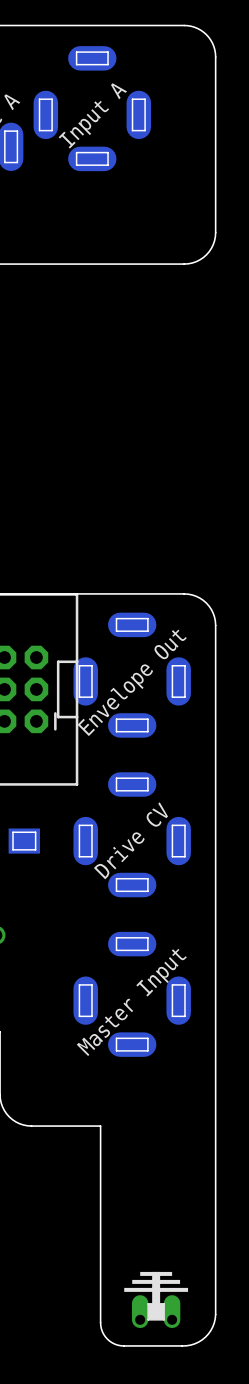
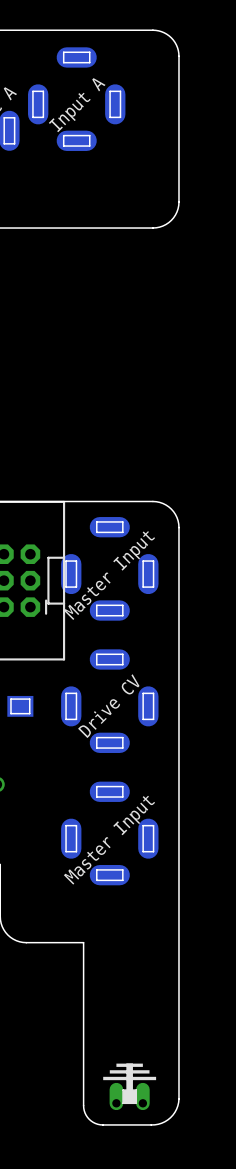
part text: Envelope Out (132, 682) -> Master Input (109, 575)

